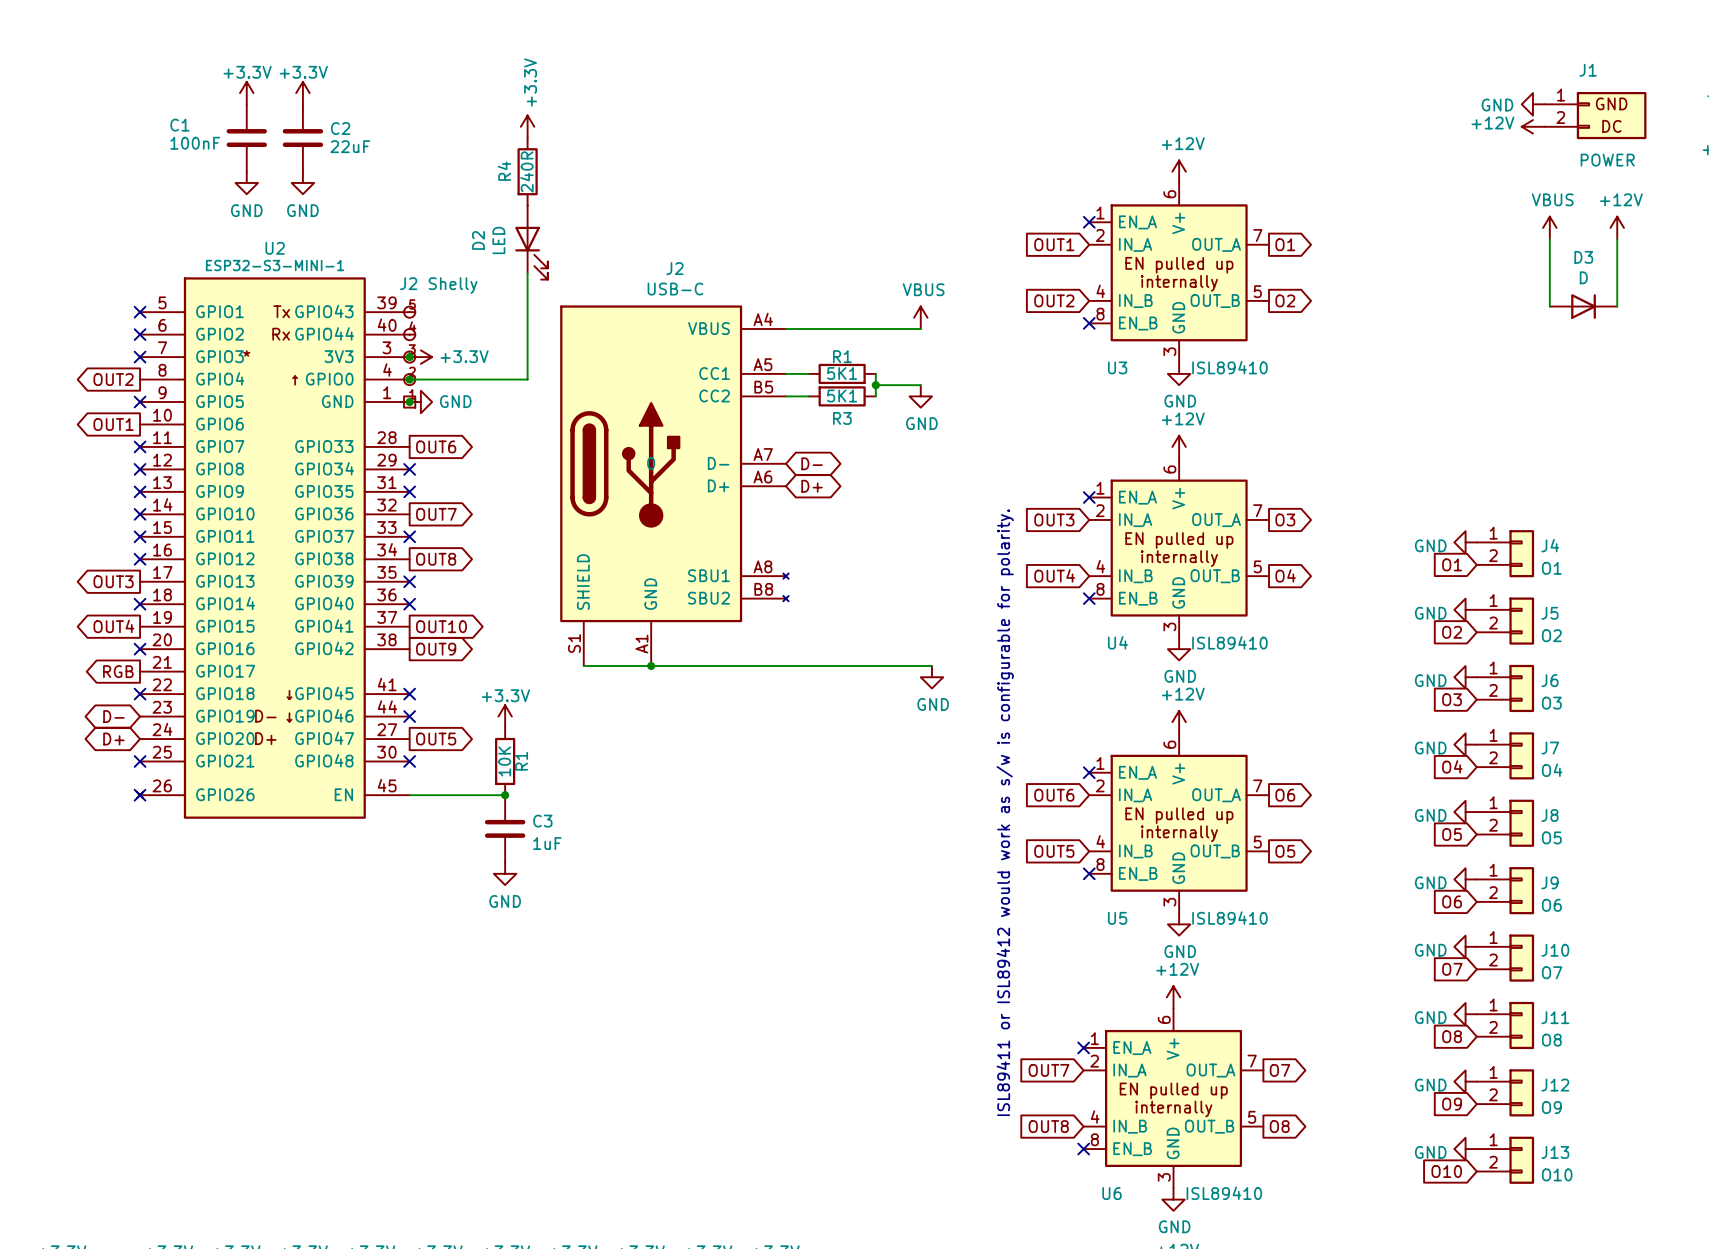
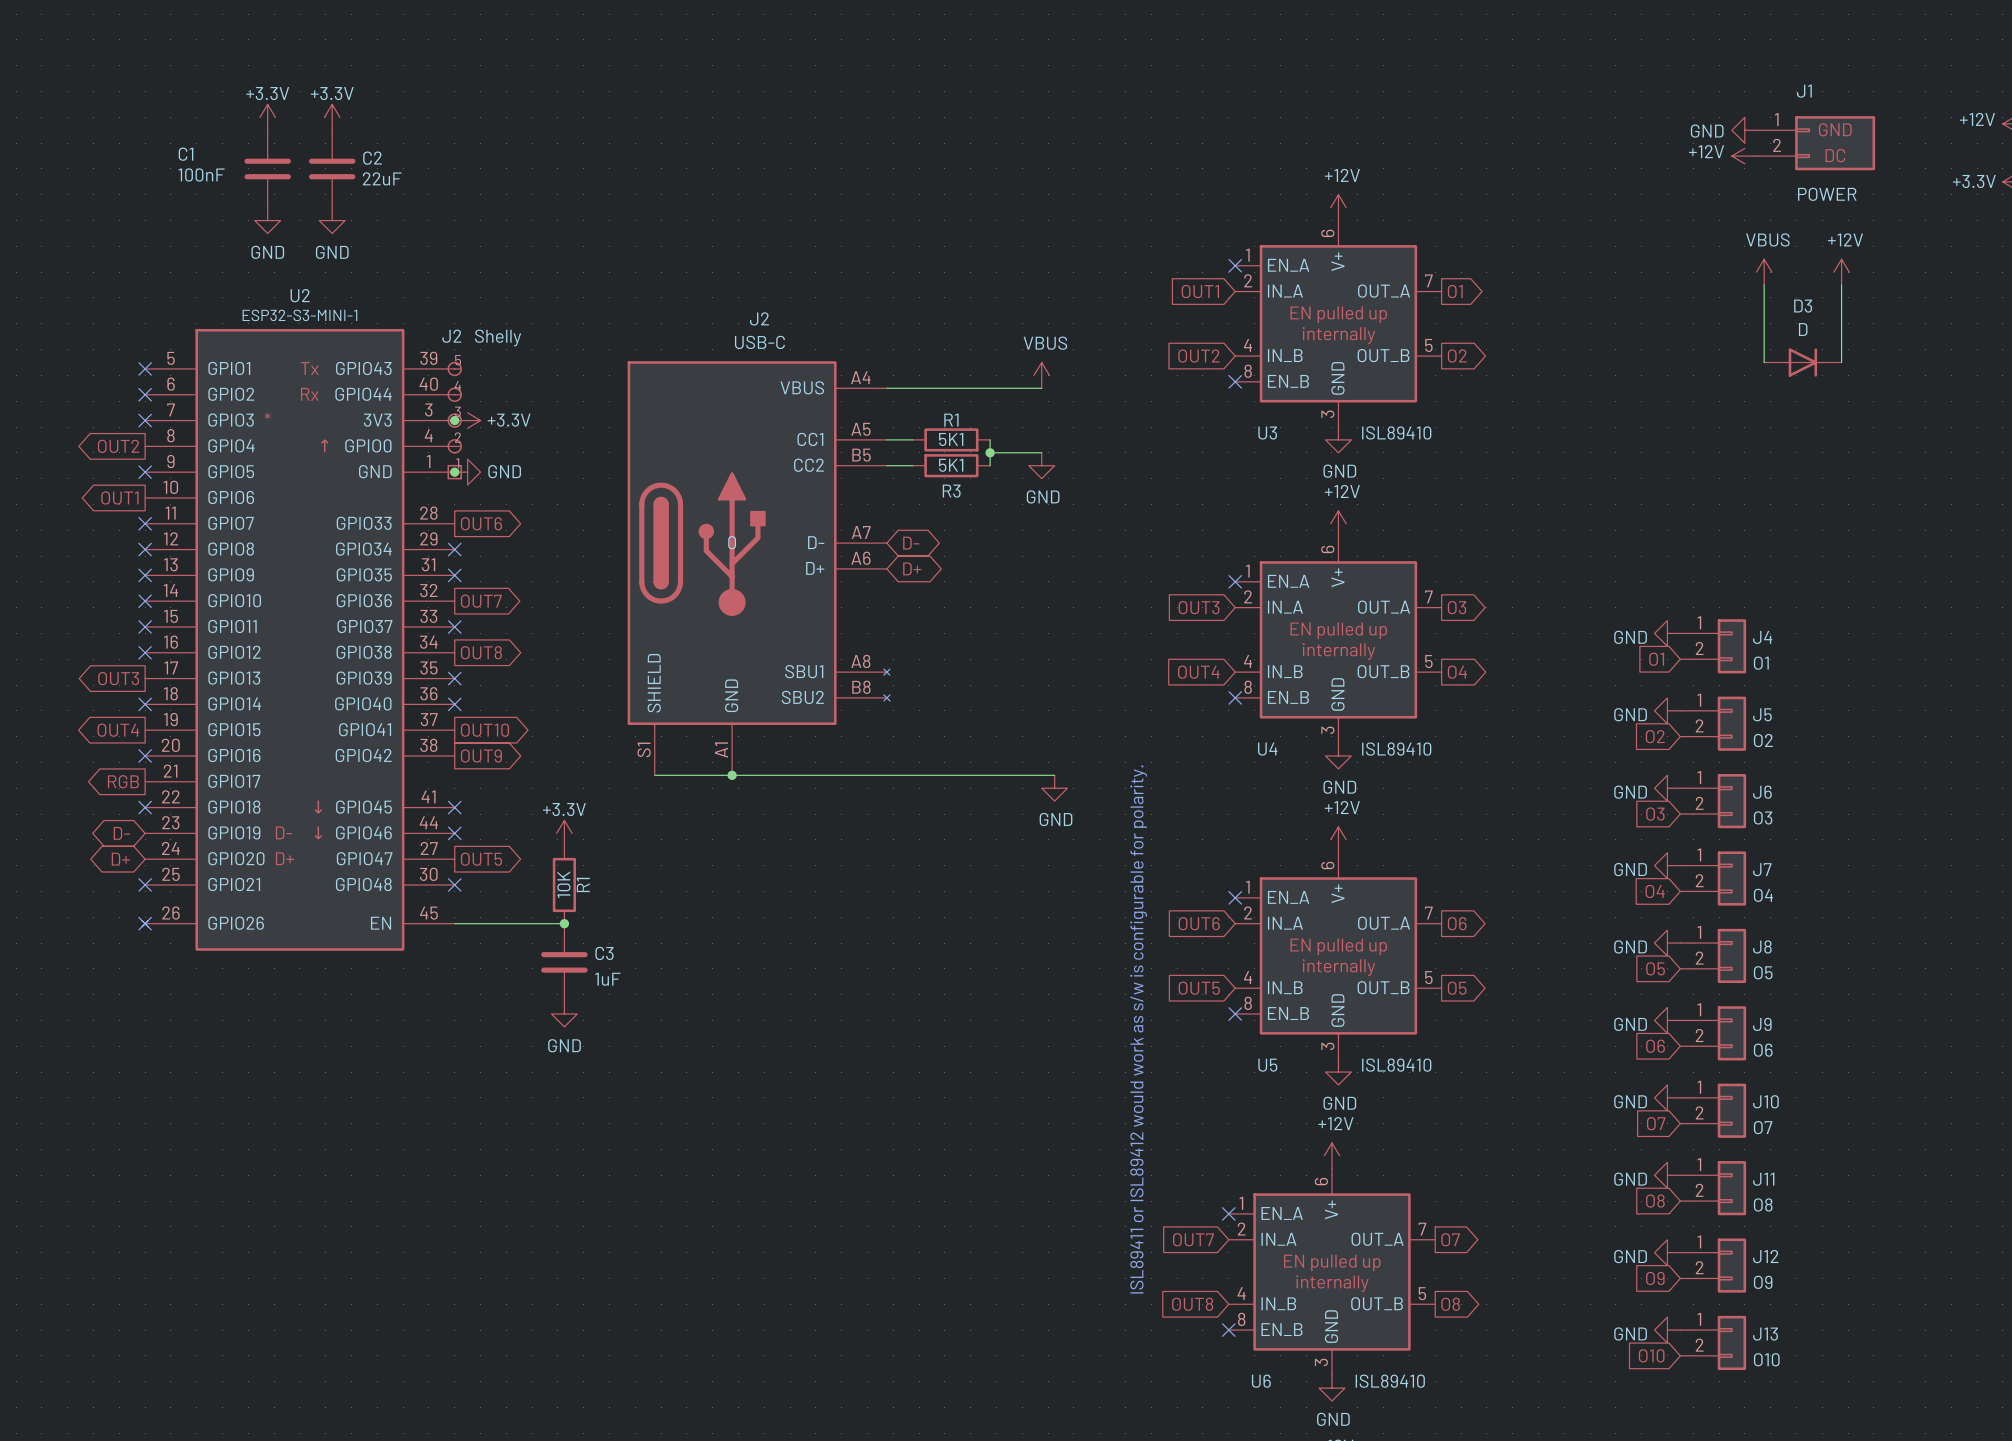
power symbol: +3.3V (527, 126) -> none
R4: 240R (527, 171) -> none
D2: LED (531, 242) -> none
wire: (527, 272) (527, 379) (409, 379) -> none
junction: (409, 379) -> none

